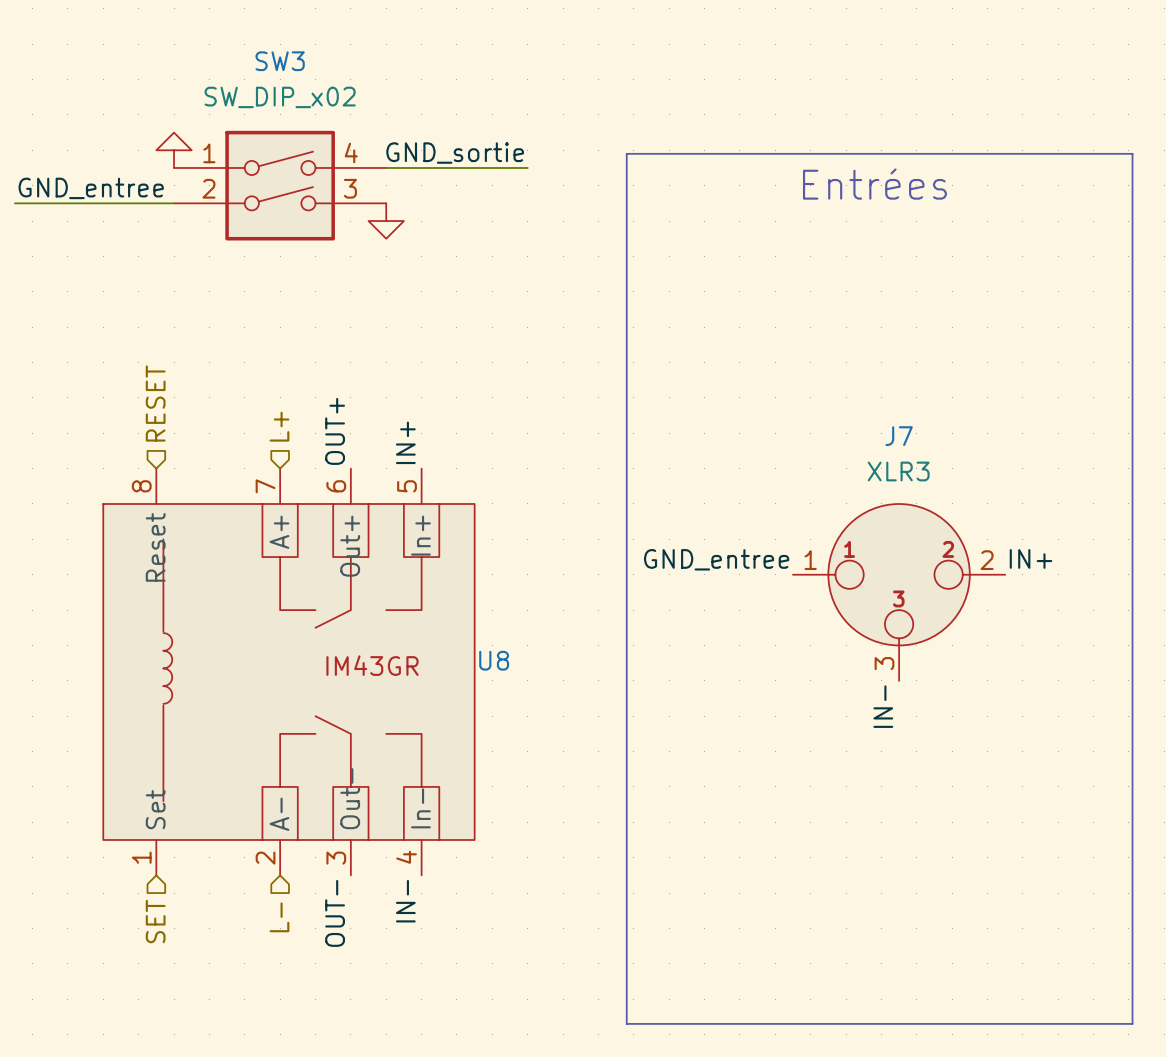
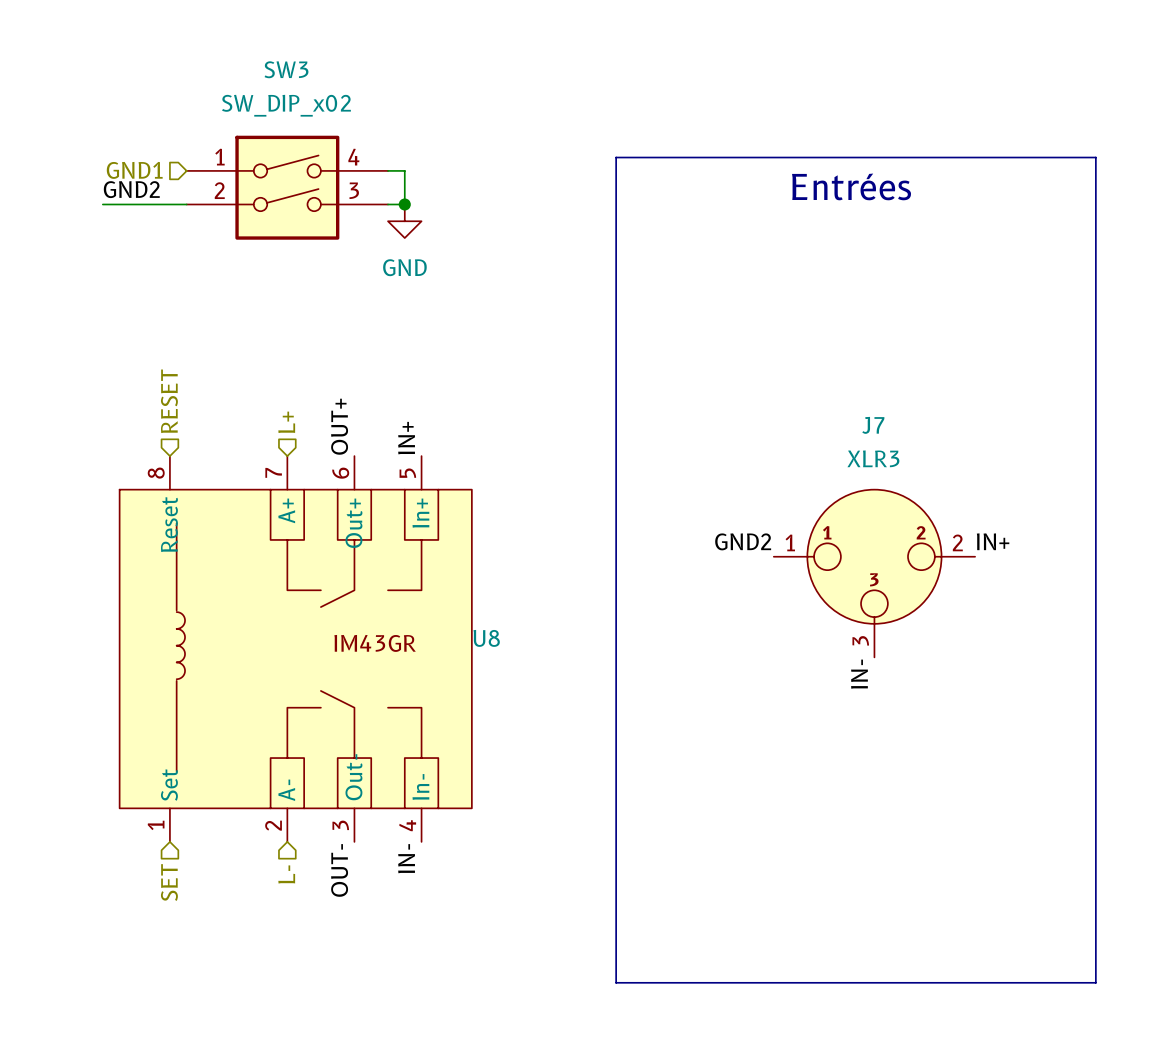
power symbol: (174, 150) -> none
label: GND_sortie (455, 153) -> none
hierarchical label: none -> GND1 (134, 170)
wire: (403, 167) (527, 167) -> (404, 170) (404, 204) (388, 204)
label: none -> GND2 (131, 189)
label: GND_entree (91, 188) -> none
wire: (14, 203) (85, 203) -> none
junction: none -> (404, 204)
power symbol: (386, 221) -> none
power symbol: none -> GND (404, 221)
label: GND_entree (716, 559) -> GND2 (743, 541)

